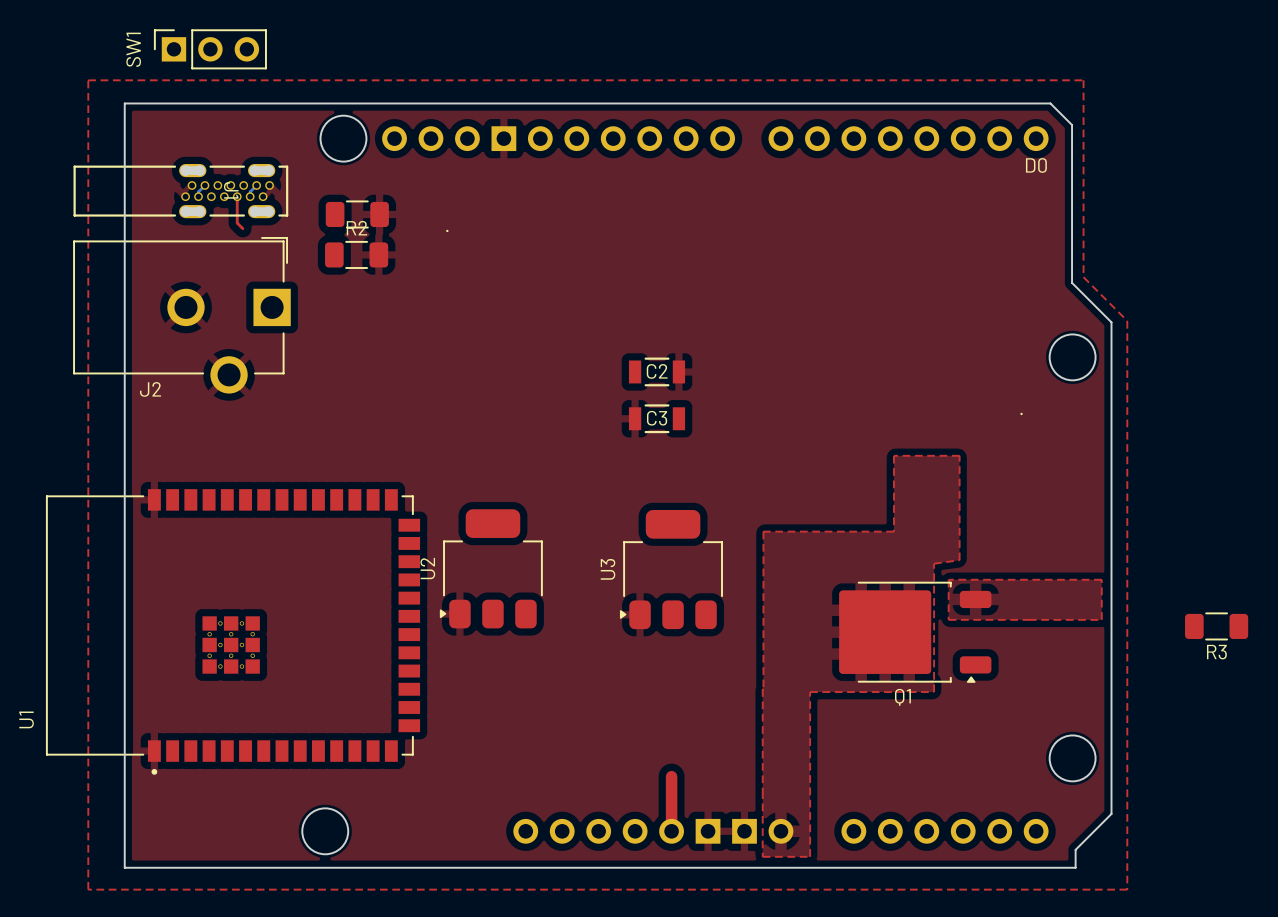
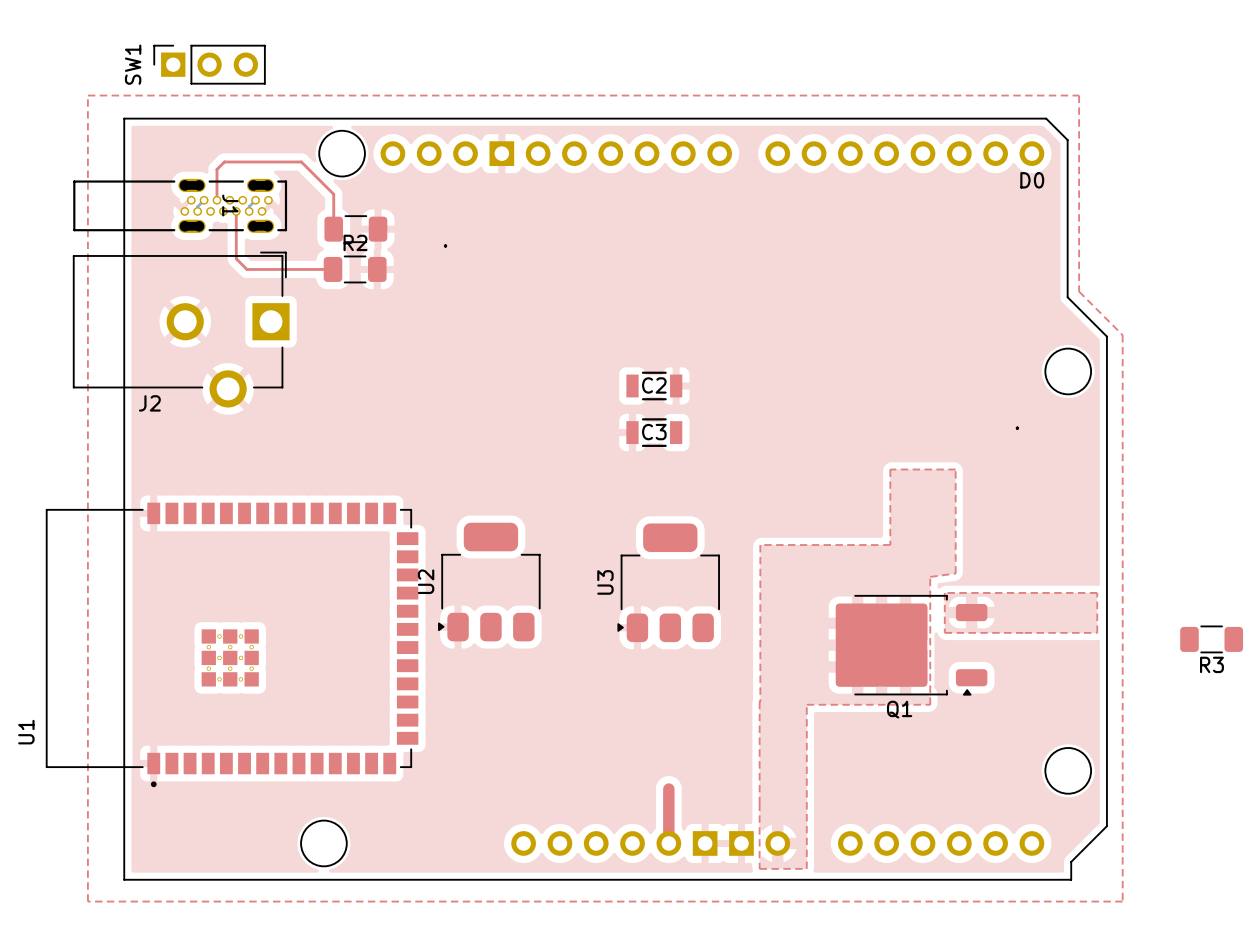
top track: none -> (216, 200) (216, 169) (224, 161) (301, 161) (333, 194) (333, 229)
top track: (237, 223) (242, 228) -> (236, 237) (236, 258) (246, 269) (332, 269)

